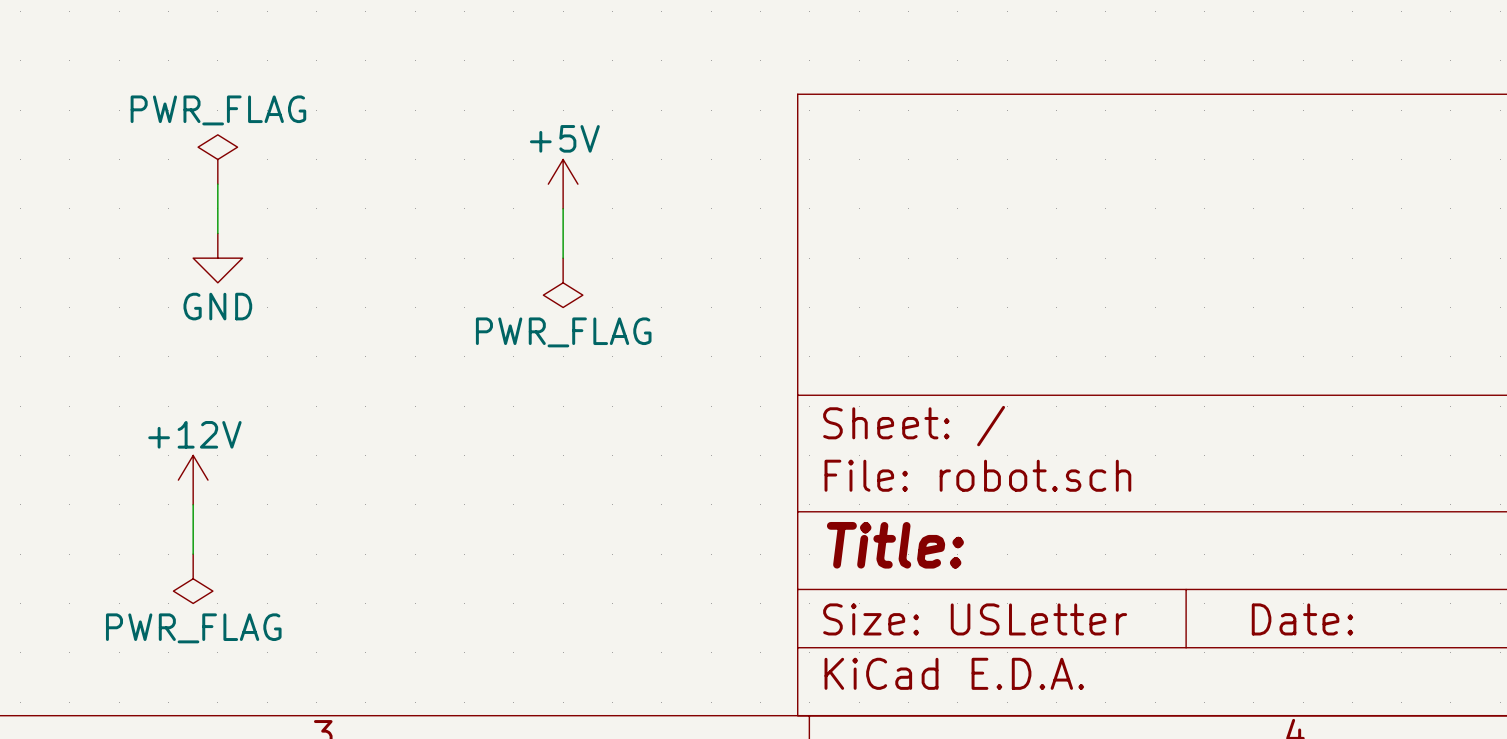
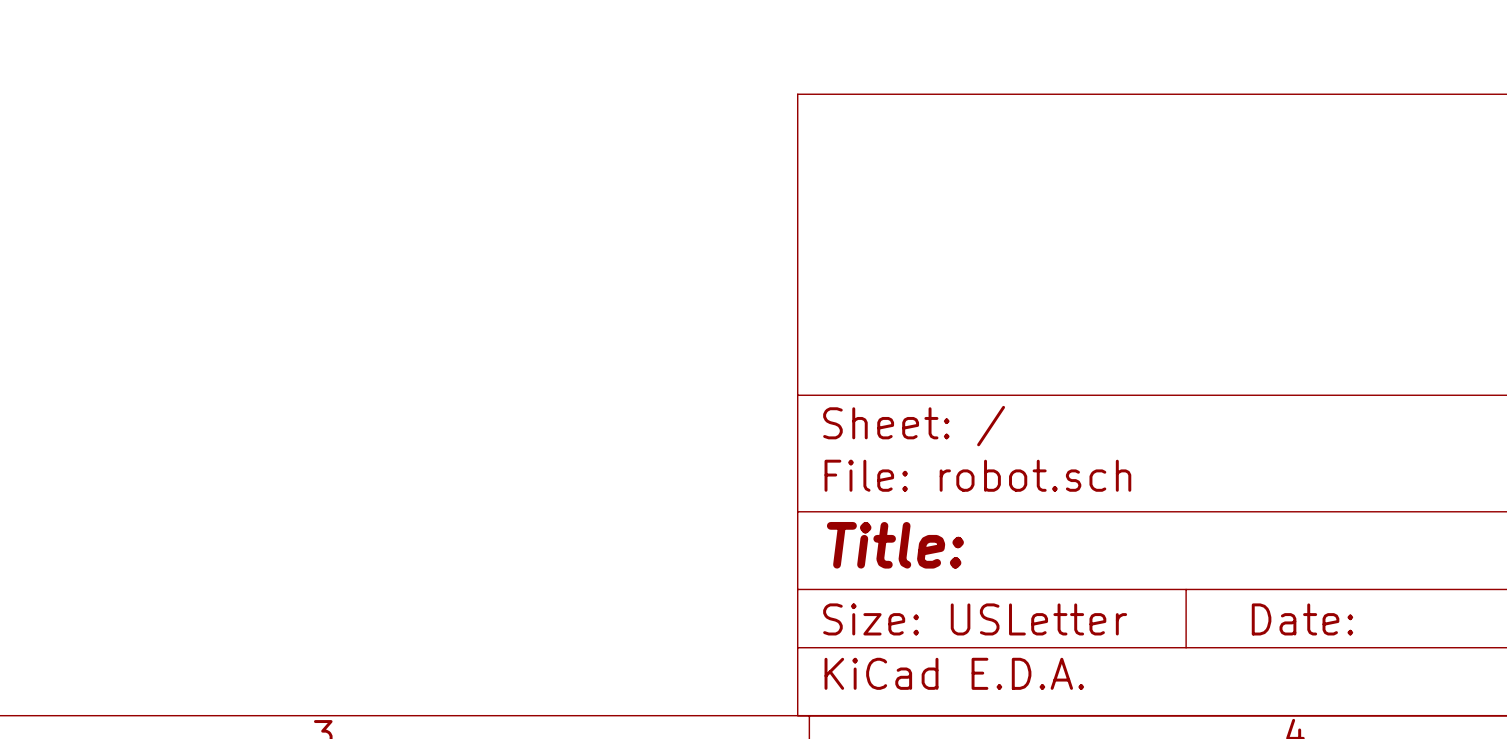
power symbol: PWR_FLAG (217, 159) -> none
wire: (217, 184) (217, 233) -> none
power symbol: +5V (563, 184) -> none
wire: (563, 208) (563, 258) -> none
power symbol: GND (217, 258) -> none
power symbol: PWR_FLAG (563, 282) -> none
power symbol: +12V (193, 480) -> none
wire: (193, 504) (193, 554) -> none
power symbol: PWR_FLAG (193, 578) -> none

